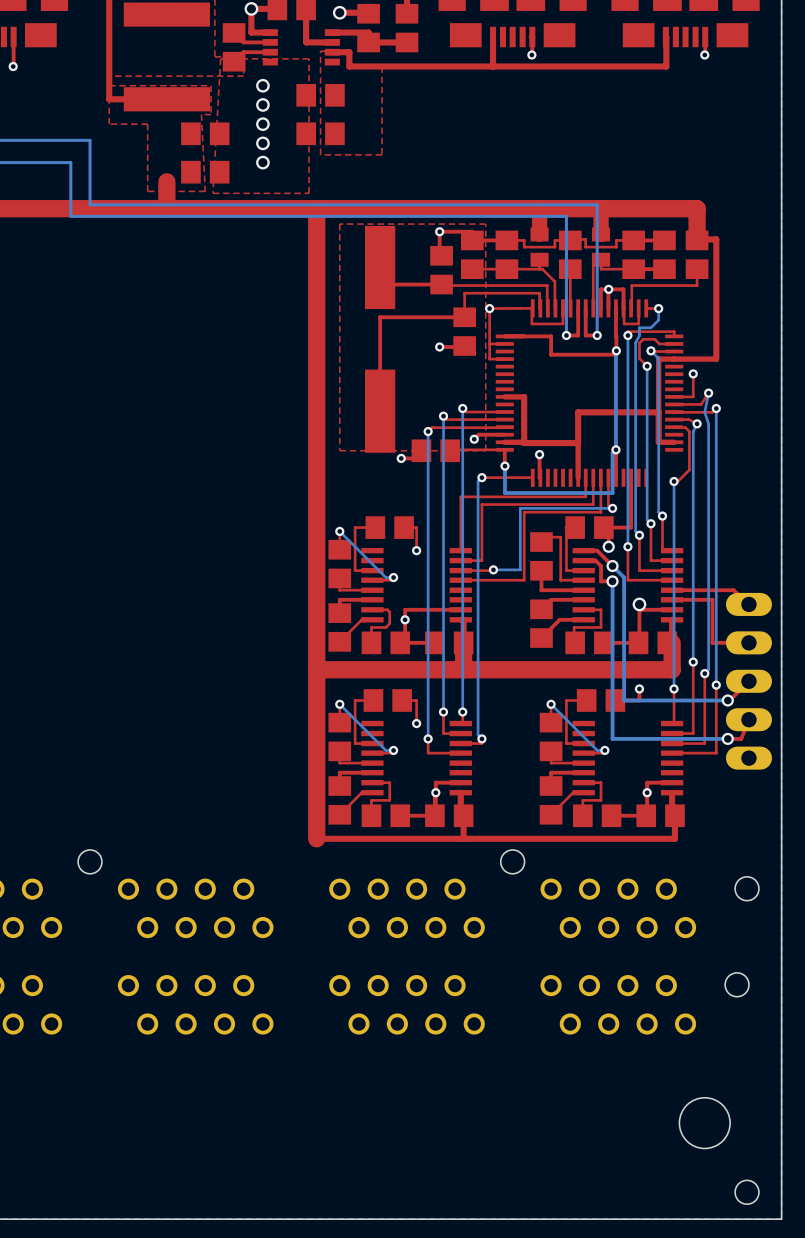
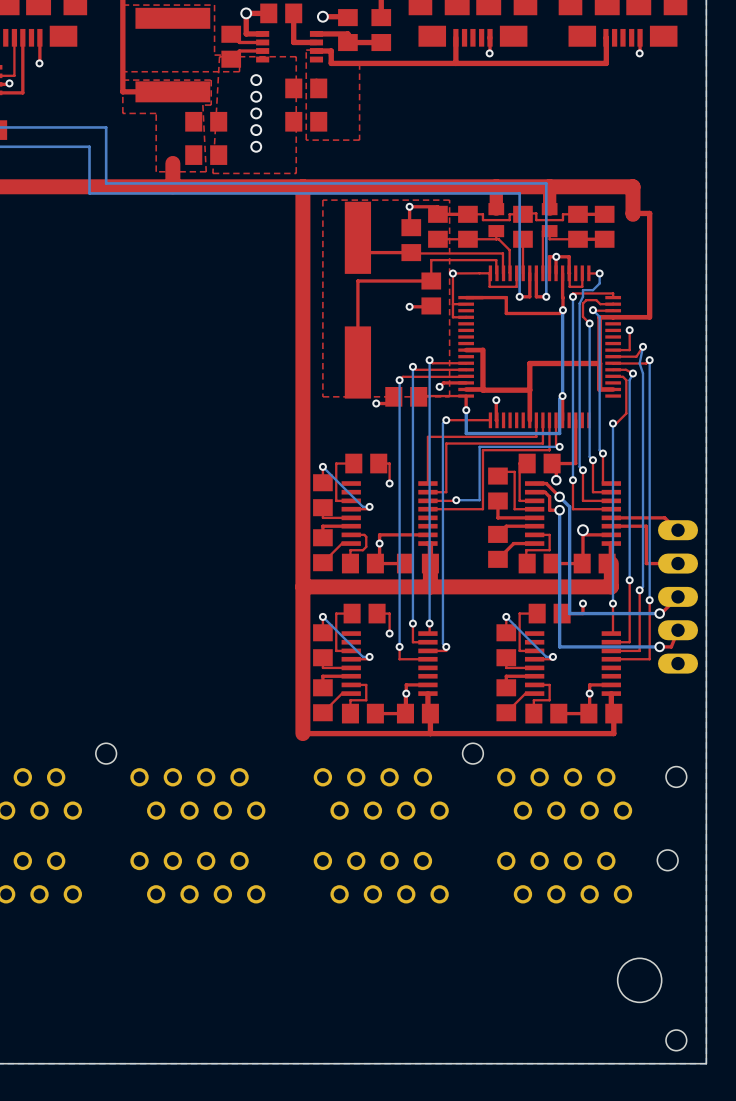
part: (697, 254) -> none
top track: (697, 269) (697, 285) (631, 285) (631, 308) -> none

